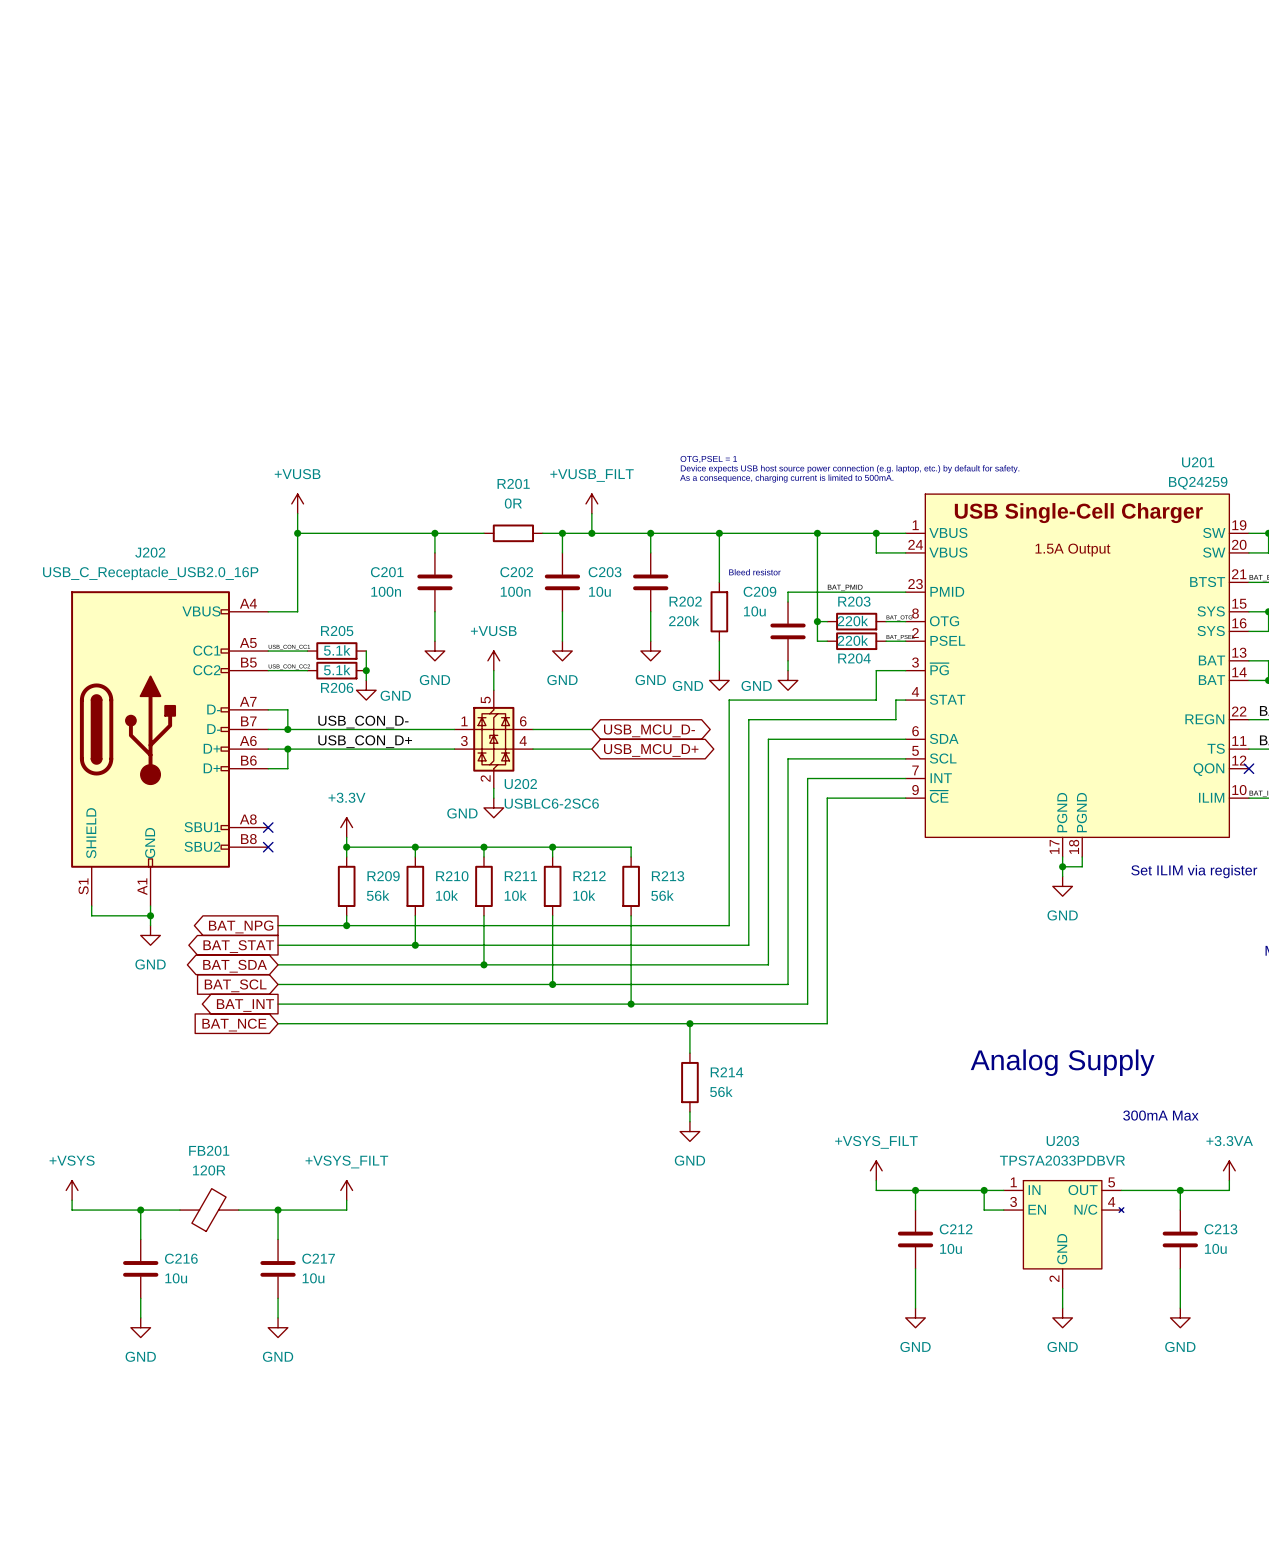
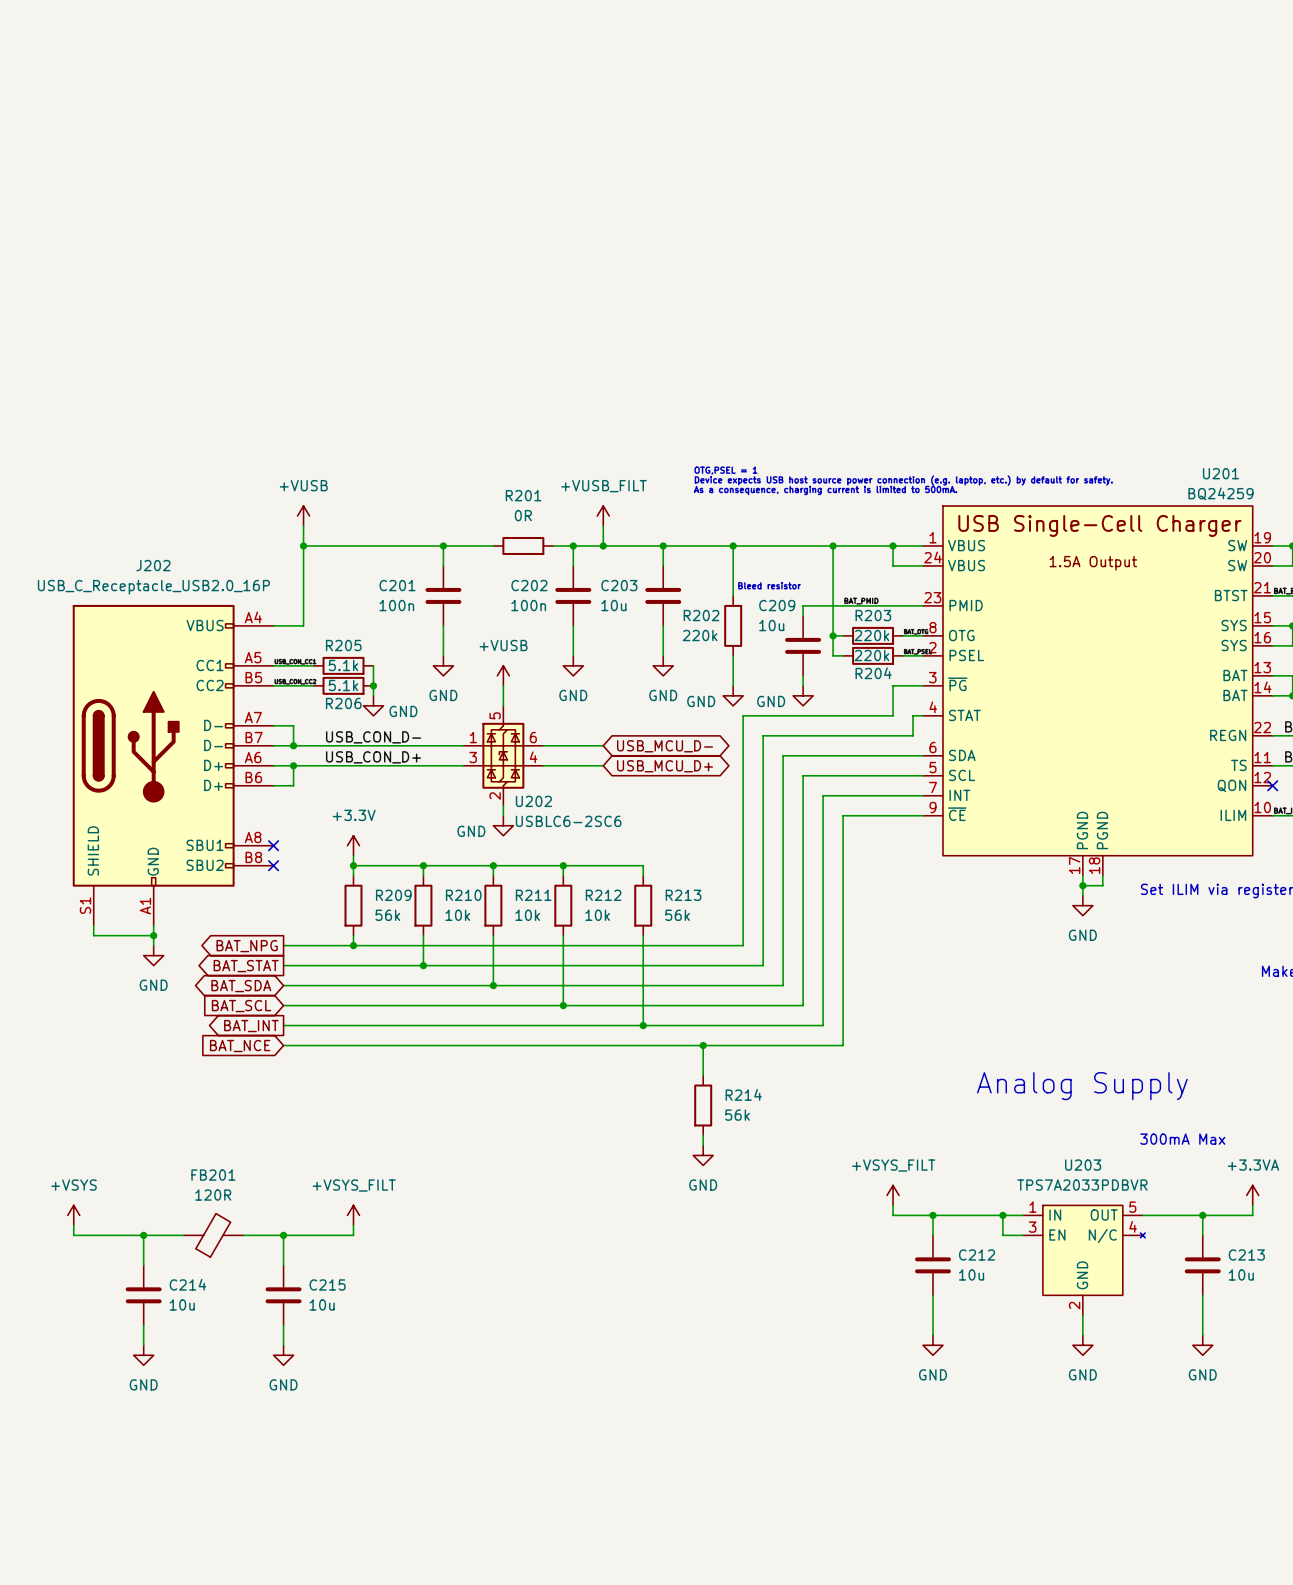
C216 name: C216 (181, 1258) -> C214 (187, 1284)
C217 name: C217 (318, 1258) -> C215 (327, 1284)

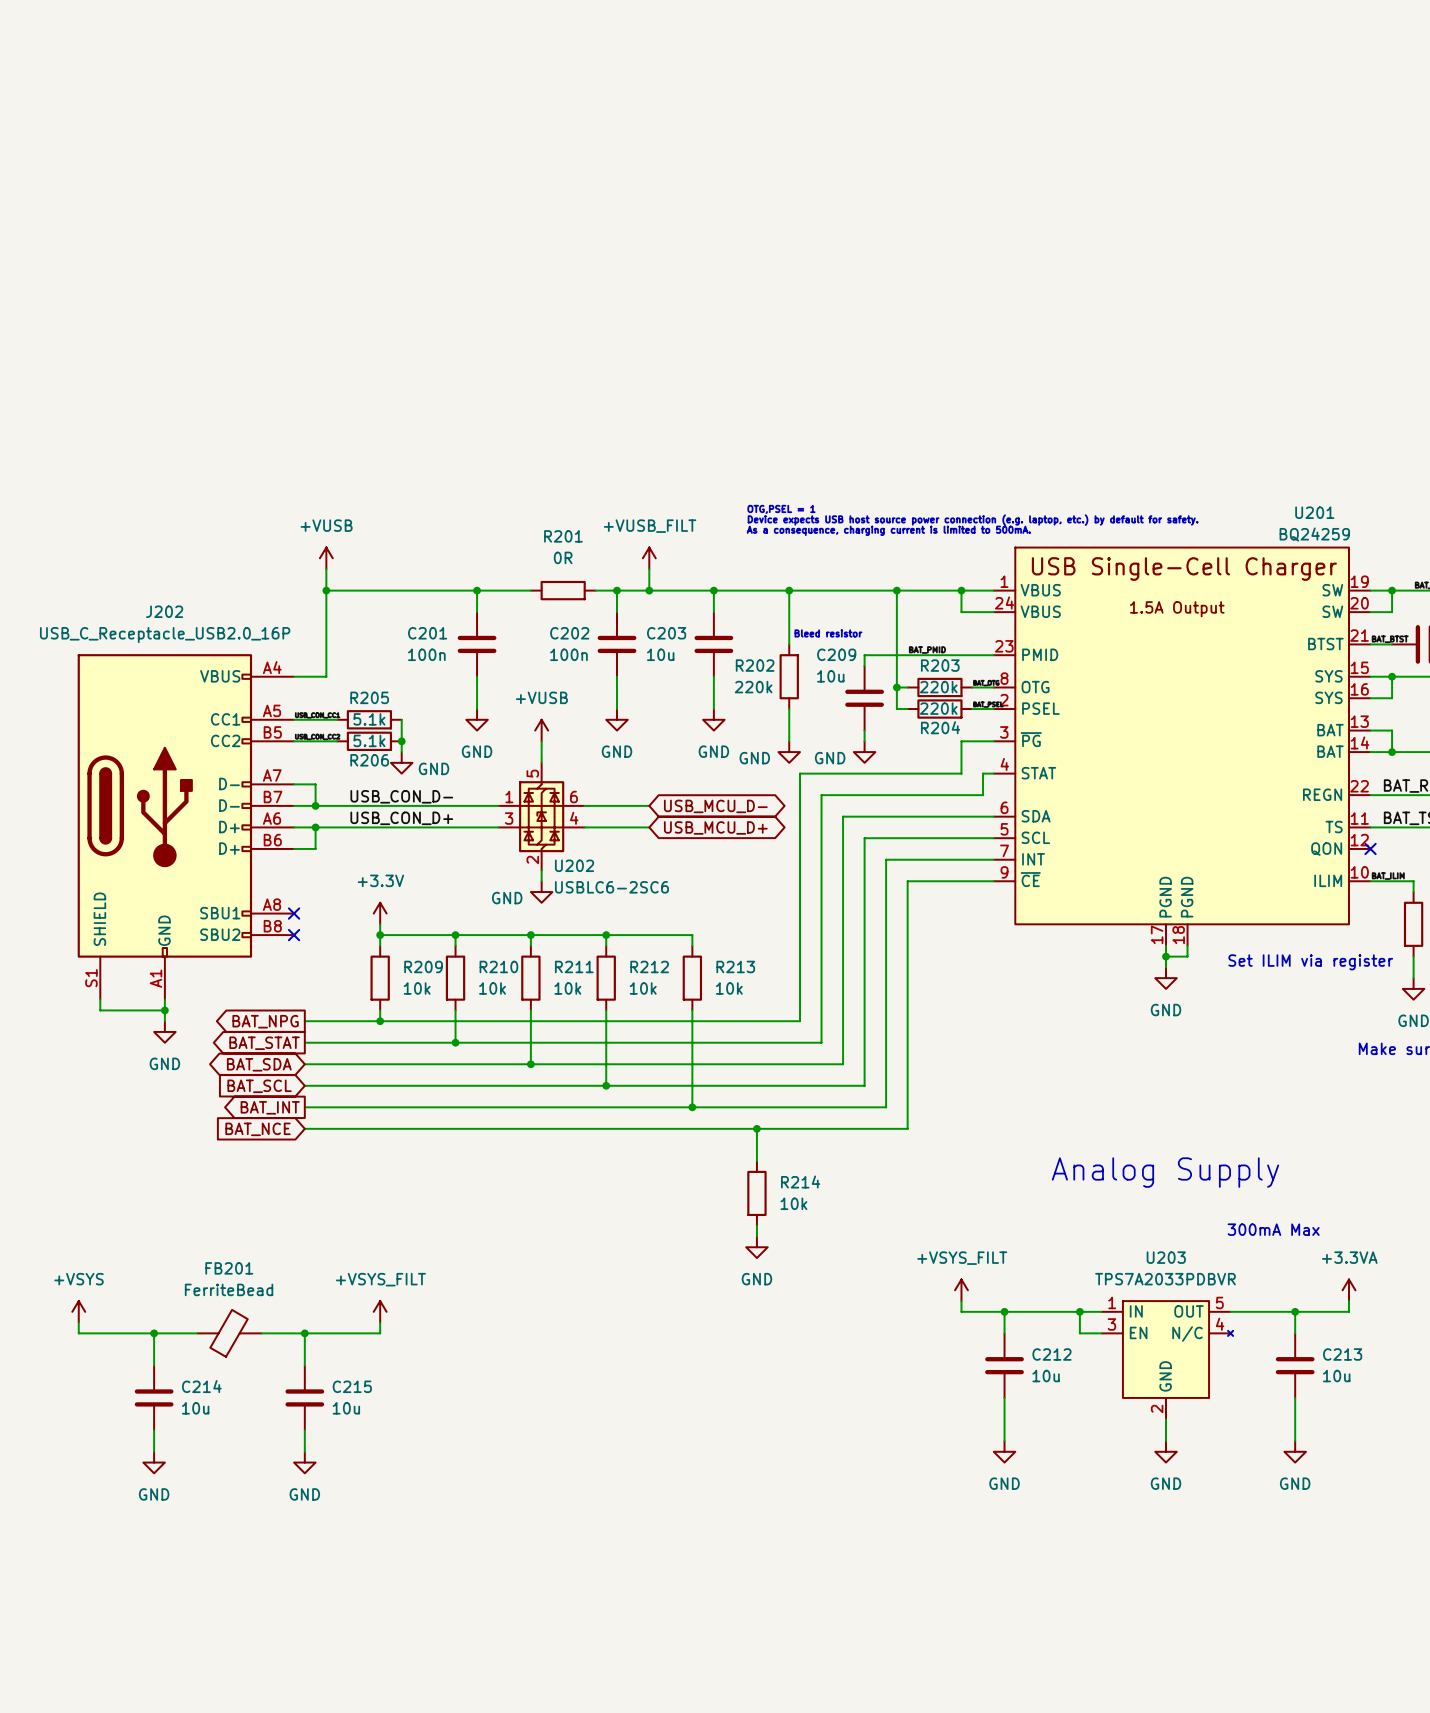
R209 value: 56k (387, 915) -> 10k (417, 988)
R213 value: 56k (677, 915) -> 10k (729, 988)
R214 value: 56k (737, 1115) -> 10k (793, 1203)
FB201 value: 120R (213, 1195) -> FerriteBead (229, 1289)

